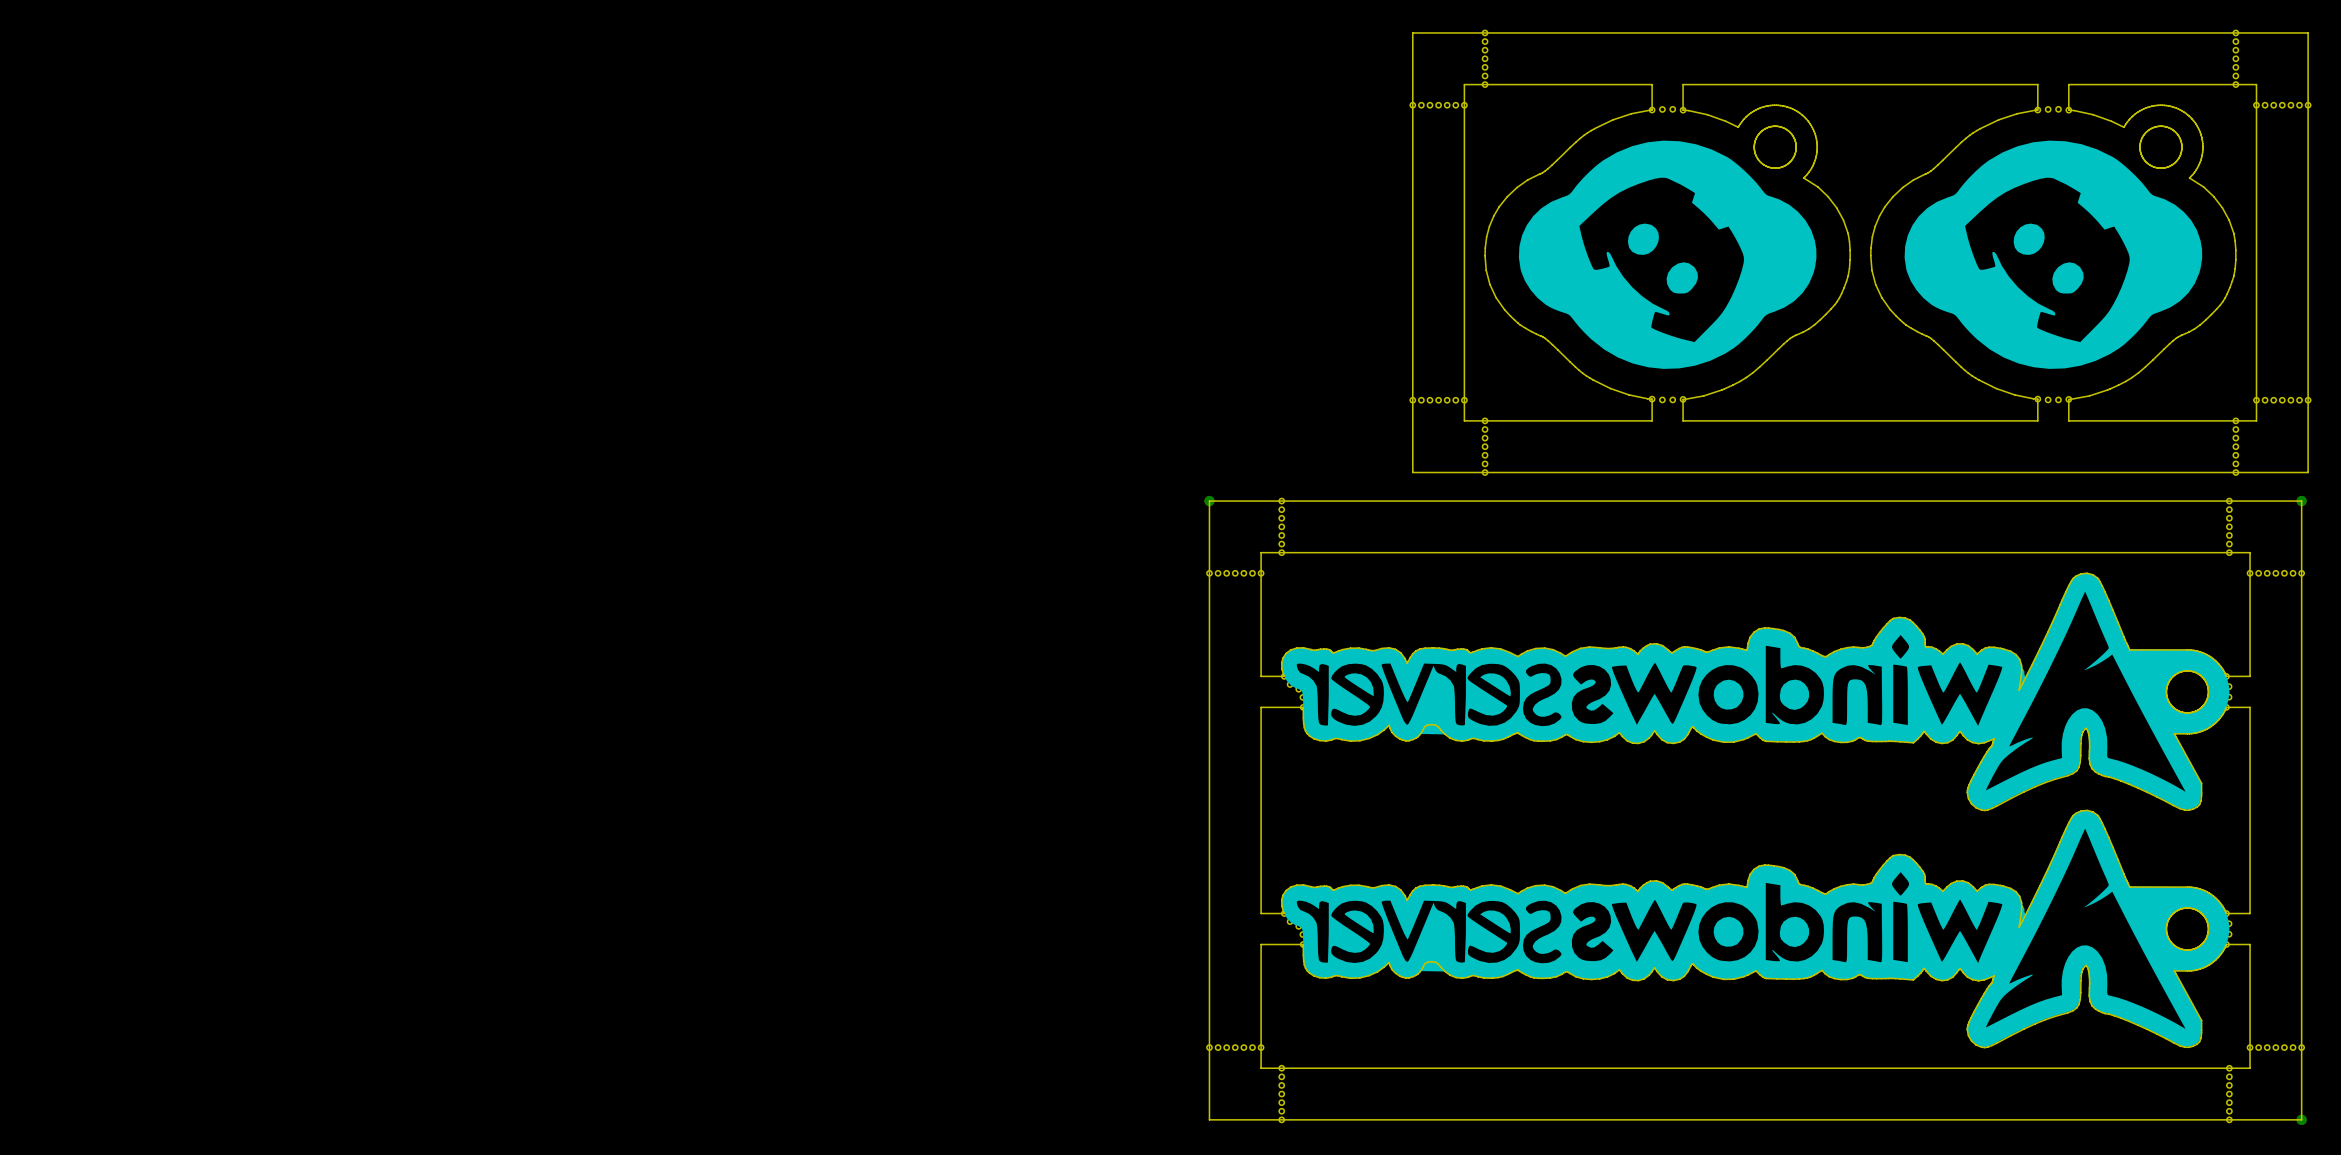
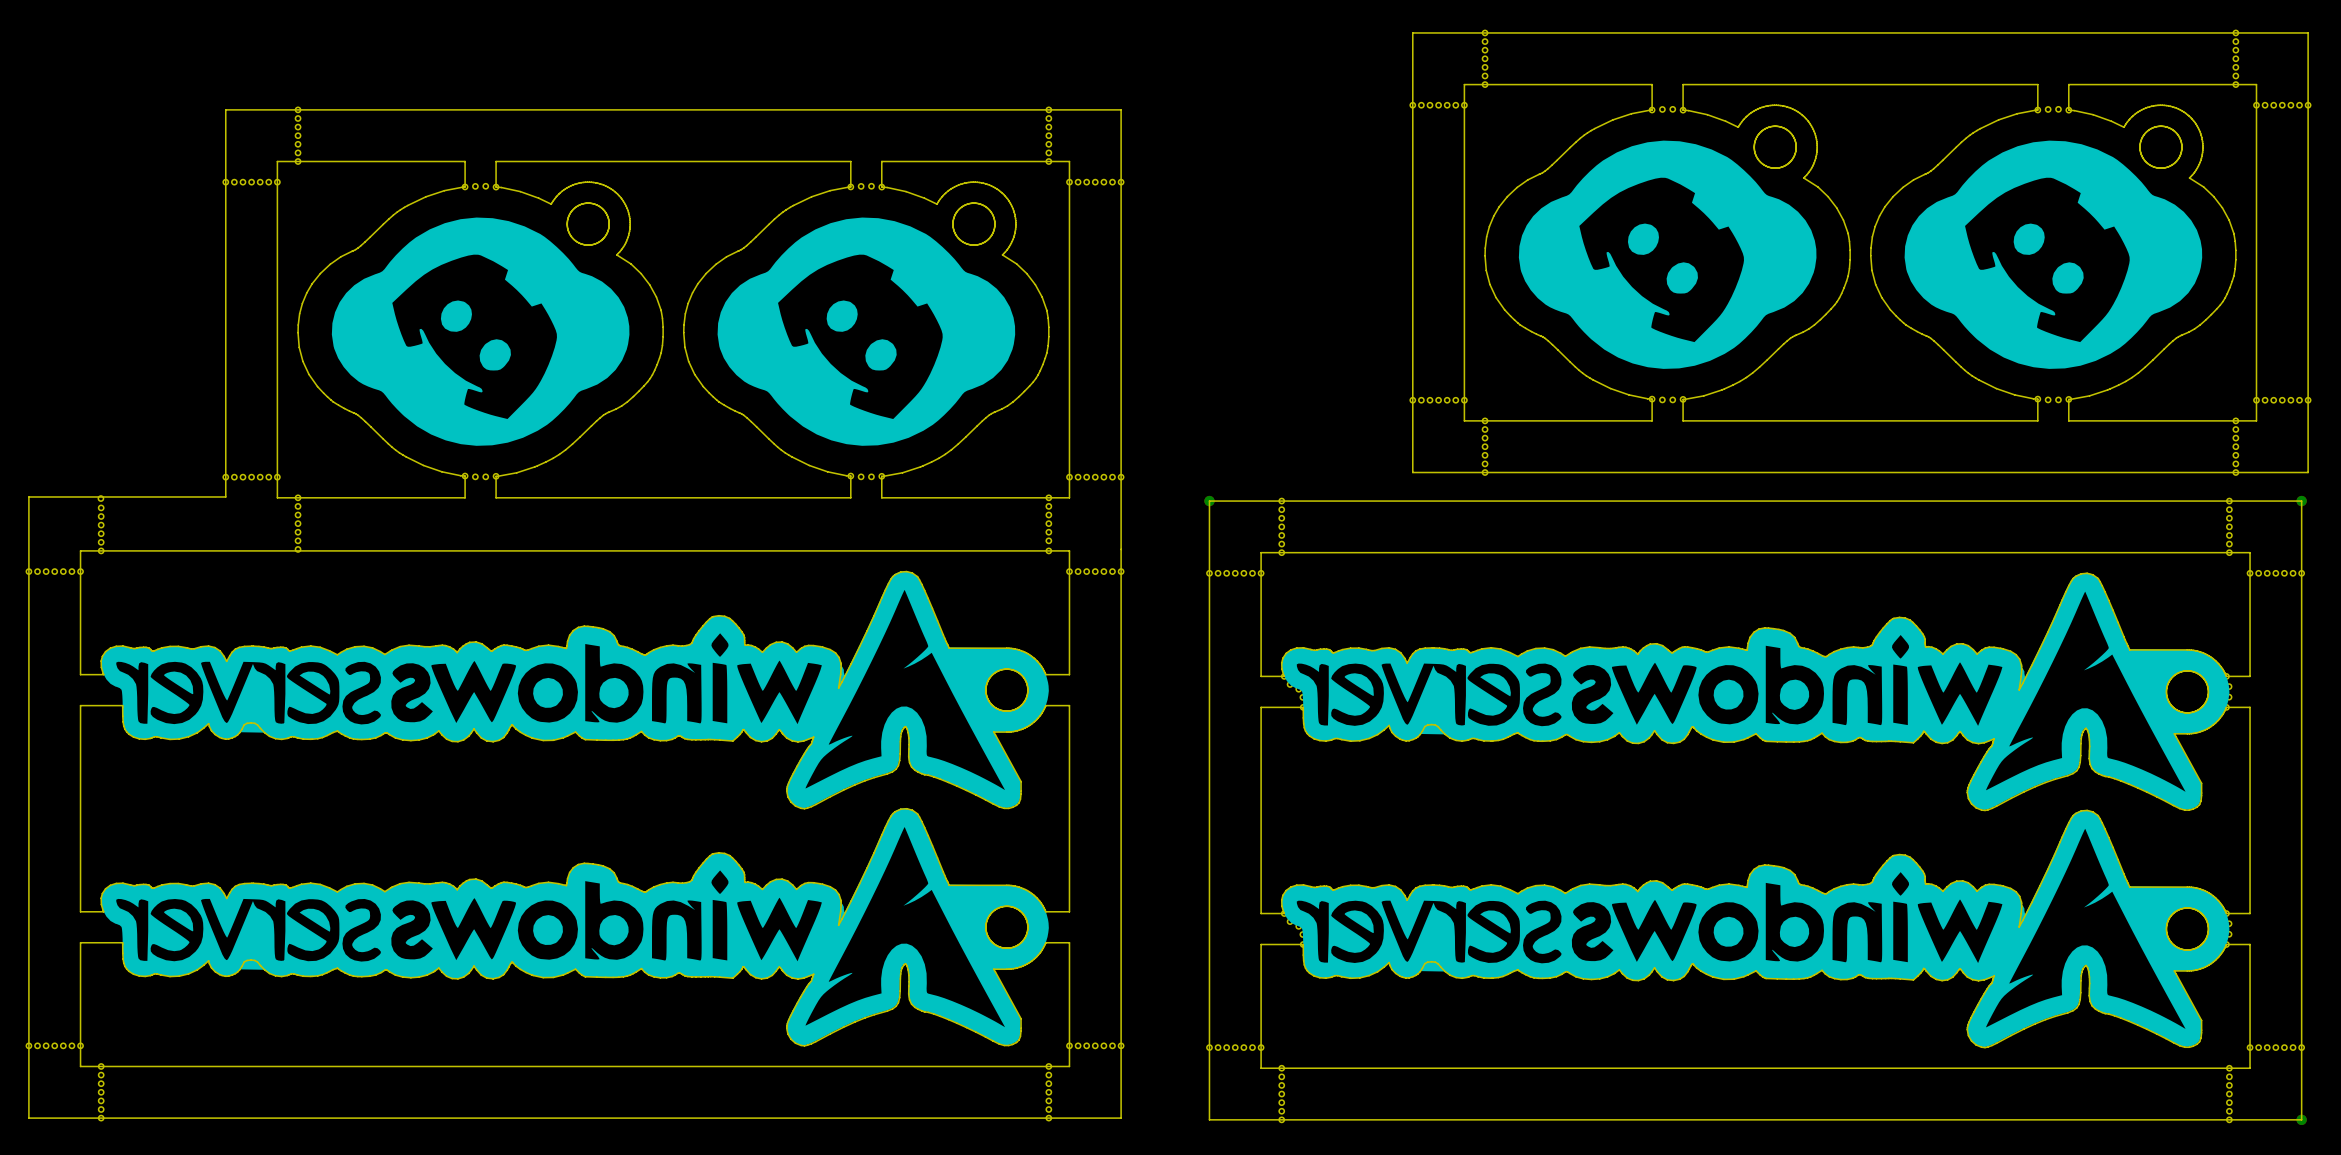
part: none -> (298, 109)
part: none -> (1048, 109)
board edge: none -> (1121, 109) (1121, 1118) (28, 1118) (28, 496) (225, 496) (225, 109) (1121, 109)
part: none -> (298, 118)
part: none -> (1048, 118)
part: none -> (298, 127)
part: none -> (1048, 127)
part: none -> (298, 135)
part: none -> (1048, 135)
part: none -> (298, 144)
part: none -> (1048, 144)
part: none -> (298, 152)
part: none -> (1048, 152)
part: none -> (298, 161)
board edge: none -> (465, 161) (277, 161) (277, 497) (465, 497) (465, 476) (441, 471) (402, 455) (358, 415) (333, 401) (323, 393) (309, 374) (302, 361) (298, 332) (302, 303) (312, 283) (320, 273) (340, 256) (358, 247) (404, 207) (425, 196) (465, 186) (465, 161)
board edge: none -> (850, 161) (850, 186) (811, 196) (790, 207) (743, 247) (726, 256) (706, 273) (697, 283) (688, 303) (683, 332) (688, 361) (694, 374) (709, 393) (719, 401) (743, 415) (788, 455) (827, 471) (850, 476) (850, 497) (496, 497) (496, 476) (516, 472) (552, 458) (572, 444) (603, 415) (621, 405) (638, 391) (650, 378) (657, 364) (662, 345) (663, 327) (661, 310) (649, 284) (630, 263) (616, 254) (626, 241) (630, 224) (627, 208) (617, 194) (601, 184) (583, 182) (563, 190) (551, 204) (520, 191) (496, 187) (496, 161) (850, 161)
part: none -> (1048, 161)
board edge: none -> (1069, 161) (1069, 497) (881, 497) (881, 476) (902, 472) (938, 458) (958, 444) (989, 415) (1007, 405) (1024, 391) (1035, 378) (1042, 364) (1048, 345) (1048, 327) (1046, 310) (1035, 284) (1016, 263) (1002, 254) (1012, 241) (1015, 224) (1012, 208) (1003, 194) (987, 184) (968, 182) (949, 190) (937, 204) (906, 191) (881, 187) (881, 161) (1069, 161)
part: none -> (225, 182)
part: none -> (234, 182)
part: none -> (242, 182)
part: none -> (251, 182)
part: none -> (260, 182)
part: none -> (268, 182)
part: none -> (277, 182)
part: none -> (1069, 182)
part: none -> (1078, 182)
part: none -> (1086, 182)
part: none -> (1095, 182)
part: none -> (1103, 182)
part: none -> (1112, 182)
part: none -> (1121, 182)
part: none -> (465, 186)
part: none -> (475, 186)
part: none -> (485, 186)
part: none -> (850, 186)
part: none -> (861, 186)
part: none -> (871, 186)
part: none -> (496, 187)
part: none -> (881, 187)
board edge: none -> (589, 203) (597, 205) (604, 210) (608, 217) (609, 225) (606, 233) (601, 240) (587, 245) (579, 243) (572, 238) (568, 231) (567, 223) (569, 215) (574, 208) (581, 204) (589, 203)
board edge: none -> (975, 203) (983, 205) (989, 210) (993, 217) (994, 225) (992, 233) (987, 240) (973, 245) (965, 243) (958, 238) (954, 231) (952, 223) (955, 215) (959, 208) (967, 204) (975, 203)
drawing: none -> [331, 217, 630, 446]
drawing: none -> [717, 217, 1016, 446]
part: none -> (465, 476)
part: none -> (475, 476)
part: none -> (485, 476)
part: none -> (496, 476)
part: none -> (850, 476)
part: none -> (861, 476)
part: none -> (871, 476)
part: none -> (881, 476)
part: none -> (225, 477)
part: none -> (234, 477)
part: none -> (242, 477)
part: none -> (251, 477)
part: none -> (260, 477)
part: none -> (268, 477)
part: none -> (277, 477)
part: none -> (1069, 477)
part: none -> (1078, 477)
part: none -> (1086, 477)
part: none -> (1095, 477)
part: none -> (1103, 477)
part: none -> (1112, 477)
part: none -> (1121, 477)
part: none -> (298, 497)
part: none -> (1048, 497)
part: none -> (100, 498)
part: none -> (298, 506)
part: none -> (1048, 506)
part: none -> (101, 507)
part: none -> (298, 515)
part: none -> (1048, 515)
part: none -> (101, 516)
part: none -> (298, 523)
part: none -> (1048, 523)
part: none -> (101, 525)
part: none -> (298, 532)
part: none -> (1048, 532)
part: none -> (101, 533)
part: none -> (298, 540)
part: none -> (1048, 540)
part: none -> (101, 542)
part: none -> (298, 549)
part: none -> (101, 550)
part: none -> (1048, 550)
board edge: none -> (1069, 550) (1069, 674) (1045, 674) (1033, 658) (1015, 649) (949, 648) (919, 579) (912, 573) (906, 571) (895, 574) (890, 579) (838, 688) (840, 663) (835, 652) (830, 649) (808, 645) (796, 652) (787, 643) (782, 642) (770, 644) (762, 652) (755, 647) (744, 644) (743, 634) (735, 624) (729, 618) (718, 615) (712, 617) (706, 622) (689, 644) (666, 645) (645, 654) (618, 644) (614, 635) (609, 631) (584, 626) (573, 630) (569, 635) (566, 648) (548, 645) (525, 650) (503, 645) (491, 650) (476, 641) (466, 643) (457, 652) (445, 645) (409, 645) (400, 646) (384, 654) (372, 647) (364, 646) (346, 649) (337, 654) (320, 647) (310, 646) (290, 650) (283, 647) (271, 648) (251, 646) (235, 649) (226, 661) (220, 651) (208, 646) (191, 648) (170, 646) (152, 651) (146, 647) (134, 648) (116, 646) (105, 651) (102, 656) (101, 667) (103, 674) (80, 674) (80, 550) (1069, 550)
part: none -> (28, 571)
part: none -> (37, 571)
part: none -> (46, 571)
part: none -> (54, 571)
part: none -> (63, 571)
part: none -> (71, 571)
part: none -> (80, 571)
drawing: none -> [101, 571, 1049, 1046]
part: none -> (1069, 571)
part: none -> (1078, 571)
part: none -> (1086, 571)
part: none -> (1095, 571)
part: none -> (1103, 571)
part: none -> (1112, 571)
part: none -> (1121, 571)
board edge: none -> (1008, 669) (1000, 670) (992, 674) (987, 681) (985, 689) (987, 697) (991, 704) (998, 709) (1006, 711) (1020, 706) (1025, 699) (1027, 691) (1026, 683) (1022, 676) (1016, 671) (1008, 669)
board edge: none -> (779, 729) (792, 740) (803, 741) (813, 737) (786, 788) (790, 802) (801, 808) (811, 806) (854, 784) (896, 769) (899, 760) (901, 733) (905, 726) (908, 738) (909, 762) (914, 770) (957, 786) (999, 806) (1008, 808) (1019, 802) (1021, 781) (993, 732) (1013, 731) (1025, 727) (1036, 719) (1045, 705) (1069, 705) (1069, 911) (1045, 911) (1033, 895) (1015, 886) (949, 885) (919, 816) (912, 810) (906, 808) (895, 811) (890, 816) (838, 925) (840, 900) (835, 890) (830, 886) (808, 882) (796, 889) (787, 881) (782, 879) (770, 881) (762, 889) (755, 884) (744, 881) (743, 872) (735, 861) (729, 855) (718, 852) (712, 854) (706, 859) (689, 881) (666, 883) (645, 892) (618, 881) (614, 872) (609, 868) (584, 863) (573, 867) (569, 872) (566, 885) (548, 882) (525, 887) (503, 882) (491, 888) (476, 879) (466, 881) (457, 889) (445, 882) (409, 882) (400, 883) (384, 891) (372, 885) (364, 883) (346, 886) (337, 891) (320, 884) (310, 883) (290, 888) (283, 884) (271, 885) (251, 883) (235, 886) (226, 898) (220, 888) (208, 883) (191, 886) (170, 883) (152, 888) (146, 884) (134, 885) (116, 883) (105, 888) (102, 893) (101, 904) (103, 911) (80, 911) (80, 705) (122, 705) (123, 721) (126, 731) (133, 737) (145, 739) (154, 736) (170, 739) (188, 736) (208, 723) (215, 734) (228, 739) (237, 734) (244, 724) (251, 722) (257, 724) (269, 736) (281, 739) (291, 736) (317, 738) (337, 731) (353, 738) (369, 739) (386, 732) (395, 737) (410, 740) (427, 738) (438, 730) (446, 739) (457, 741) (468, 736) (474, 728) (481, 737) (492, 741) (503, 737) (511, 725) (526, 735) (543, 740) (563, 737) (575, 732) (584, 739) (618, 740) (630, 737) (641, 731) (648, 737) (660, 740) (672, 739) (679, 735) (687, 739) (732, 741) (743, 729) (750, 737) (761, 741) (772, 738) (779, 729)
board edge: none -> (1008, 906) (1000, 907) (992, 911) (987, 918) (985, 926) (987, 934) (991, 941) (998, 946) (1006, 948) (1020, 943) (1025, 936) (1027, 928) (1026, 920) (1022, 913) (1016, 908) (1008, 906)
board edge: none -> (779, 966) (792, 977) (803, 978) (813, 974) (786, 1025) (790, 1039) (801, 1045) (811, 1043) (854, 1022) (896, 1006) (899, 997) (901, 970) (905, 963) (908, 975) (909, 999) (914, 1007) (957, 1023) (999, 1044) (1008, 1045) (1019, 1039) (1021, 1018) (993, 969) (1013, 968) (1025, 965) (1036, 956) (1045, 942) (1069, 942) (1069, 1066) (80, 1066) (80, 942) (122, 942) (123, 959) (126, 968) (133, 974) (145, 976) (154, 973) (170, 976) (188, 973) (208, 960) (215, 971) (228, 976) (237, 972) (244, 961) (251, 959) (257, 962) (269, 973) (281, 976) (291, 973) (317, 975) (337, 968) (353, 976) (369, 976) (386, 969) (395, 975) (410, 977) (427, 975) (438, 968) (446, 976) (457, 978) (468, 973) (474, 966) (481, 975) (492, 978) (503, 974) (511, 962) (526, 972) (543, 977) (563, 974) (575, 969) (584, 976) (618, 977) (630, 975) (641, 968) (648, 974) (660, 977) (672, 976) (679, 972) (687, 976) (732, 978) (743, 966) (750, 974) (761, 978) (772, 975) (779, 967)
part: none -> (28, 1045)
part: none -> (37, 1045)
part: none -> (46, 1045)
part: none -> (54, 1045)
part: none -> (63, 1045)
part: none -> (71, 1045)
part: none -> (80, 1045)
part: none -> (1069, 1045)
part: none -> (1078, 1045)
part: none -> (1086, 1045)
part: none -> (1095, 1045)
part: none -> (1103, 1045)
part: none -> (1112, 1045)
part: none -> (1121, 1045)
part: none -> (101, 1066)
part: none -> (1048, 1066)
part: none -> (101, 1075)
part: none -> (1048, 1075)
part: none -> (101, 1083)
part: none -> (1048, 1083)
part: none -> (101, 1092)
part: none -> (1048, 1092)
part: none -> (101, 1100)
part: none -> (1048, 1100)
part: none -> (101, 1109)
part: none -> (1048, 1109)
part: none -> (101, 1118)
part: none -> (1048, 1118)

